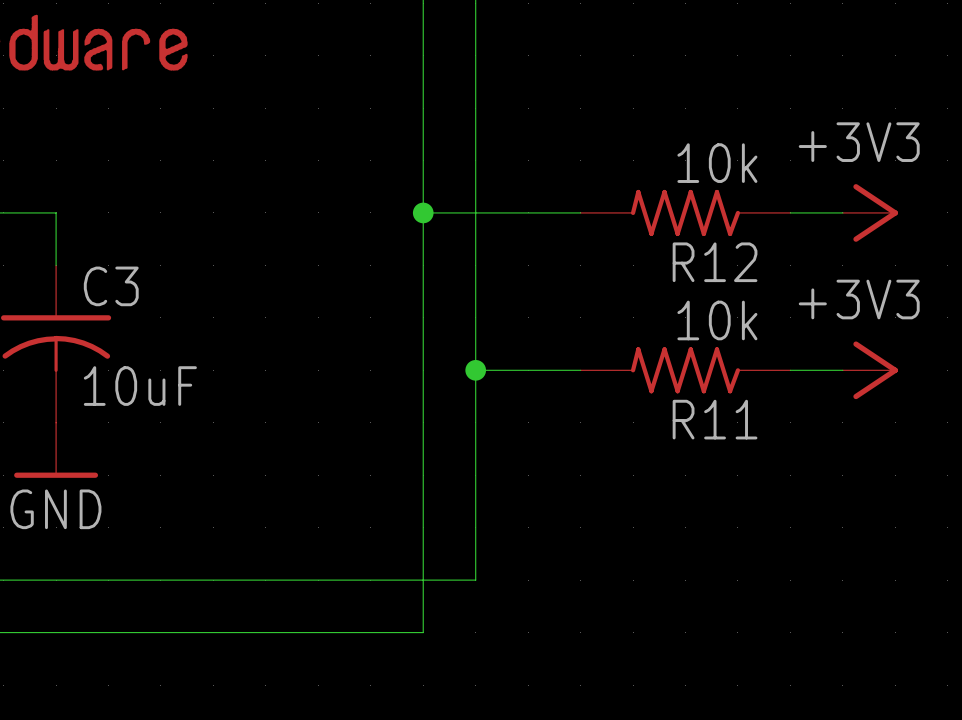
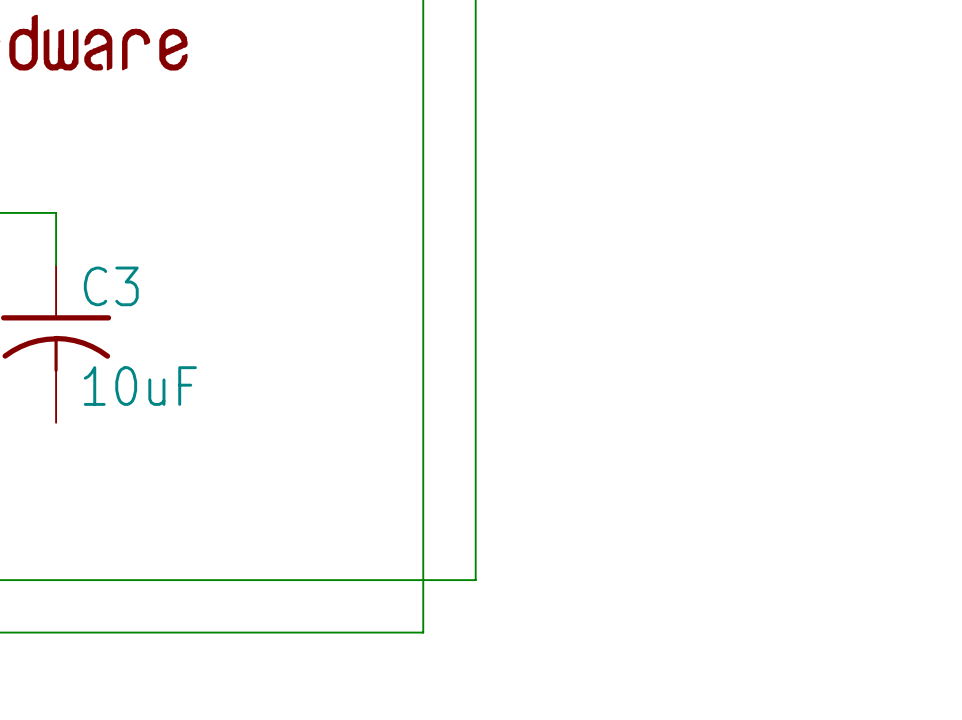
wire: (423, 212) (580, 212) -> none
junction: (423, 212) -> none
R12: 10k (685, 212) -> none
wire: (790, 212) (842, 212) -> none
power symbol: +3V3 (870, 212) -> none
wire: (475, 370) (580, 370) -> none
junction: (475, 370) -> none
R11: 10k (685, 370) -> none
wire: (790, 370) (842, 370) -> none
power symbol: +3V3 (870, 370) -> none
power symbol: GND (56, 450) -> none

